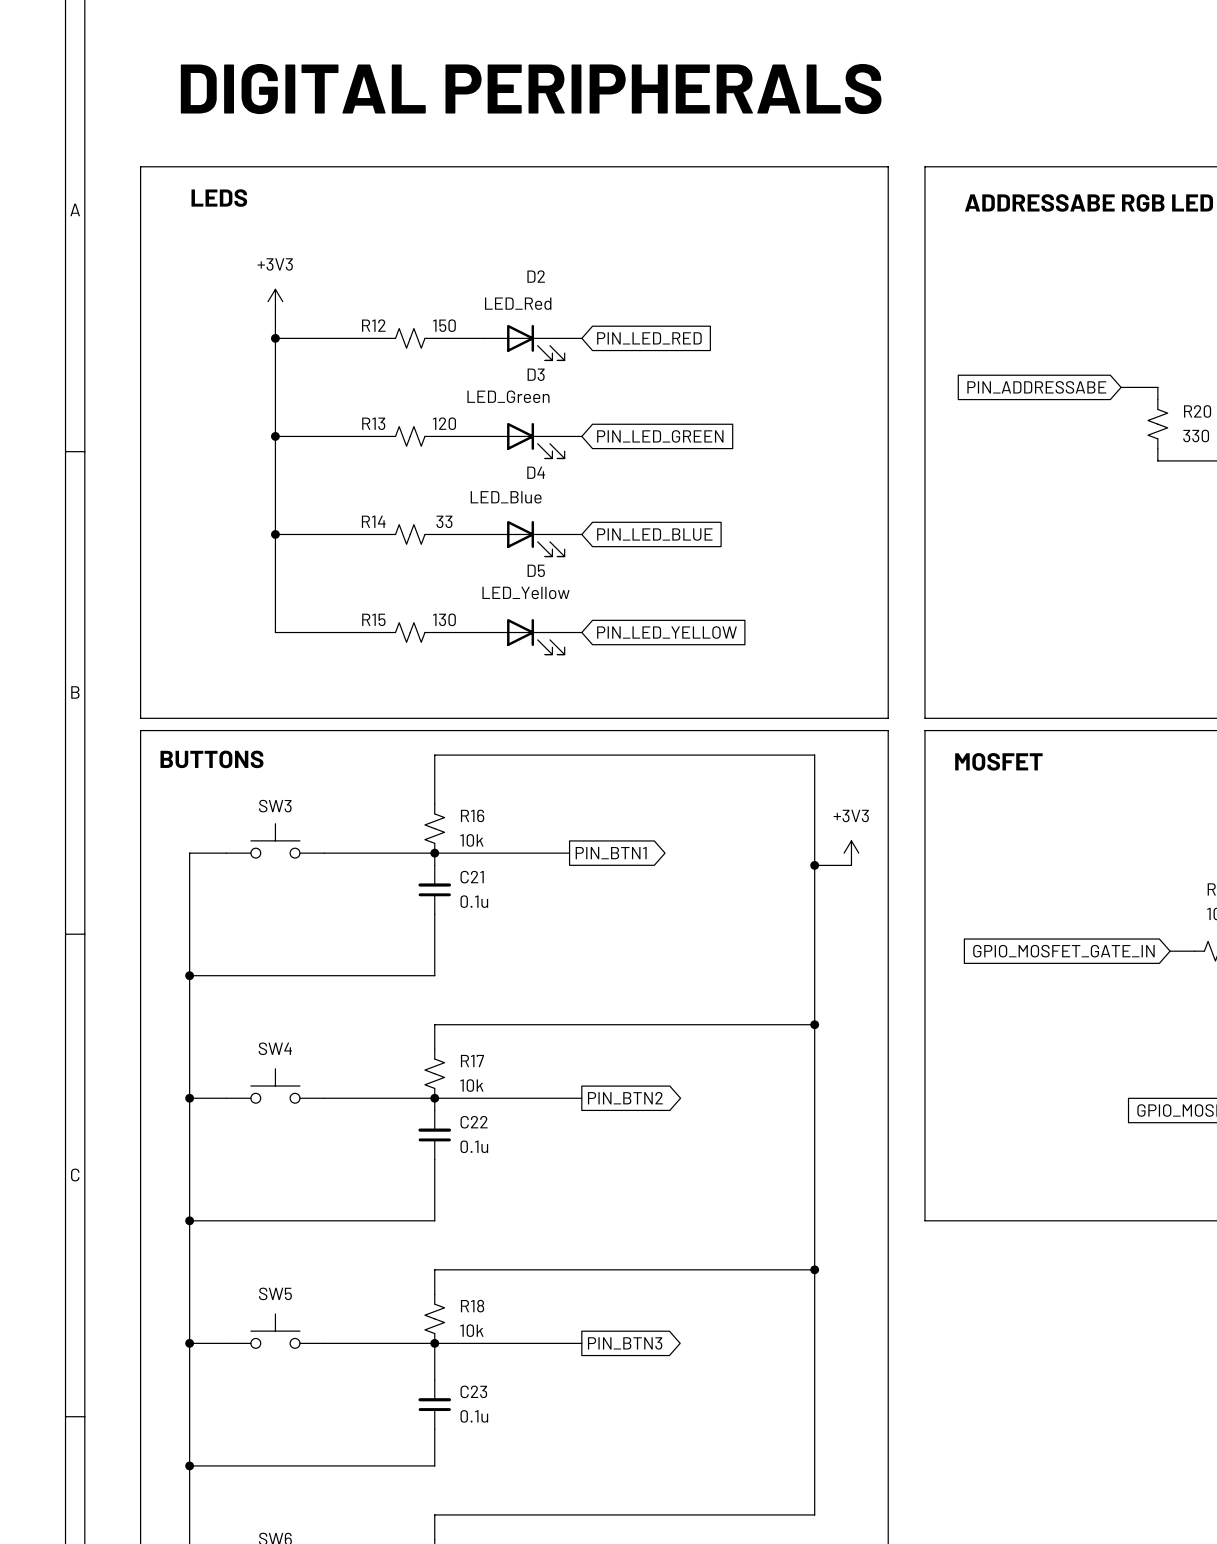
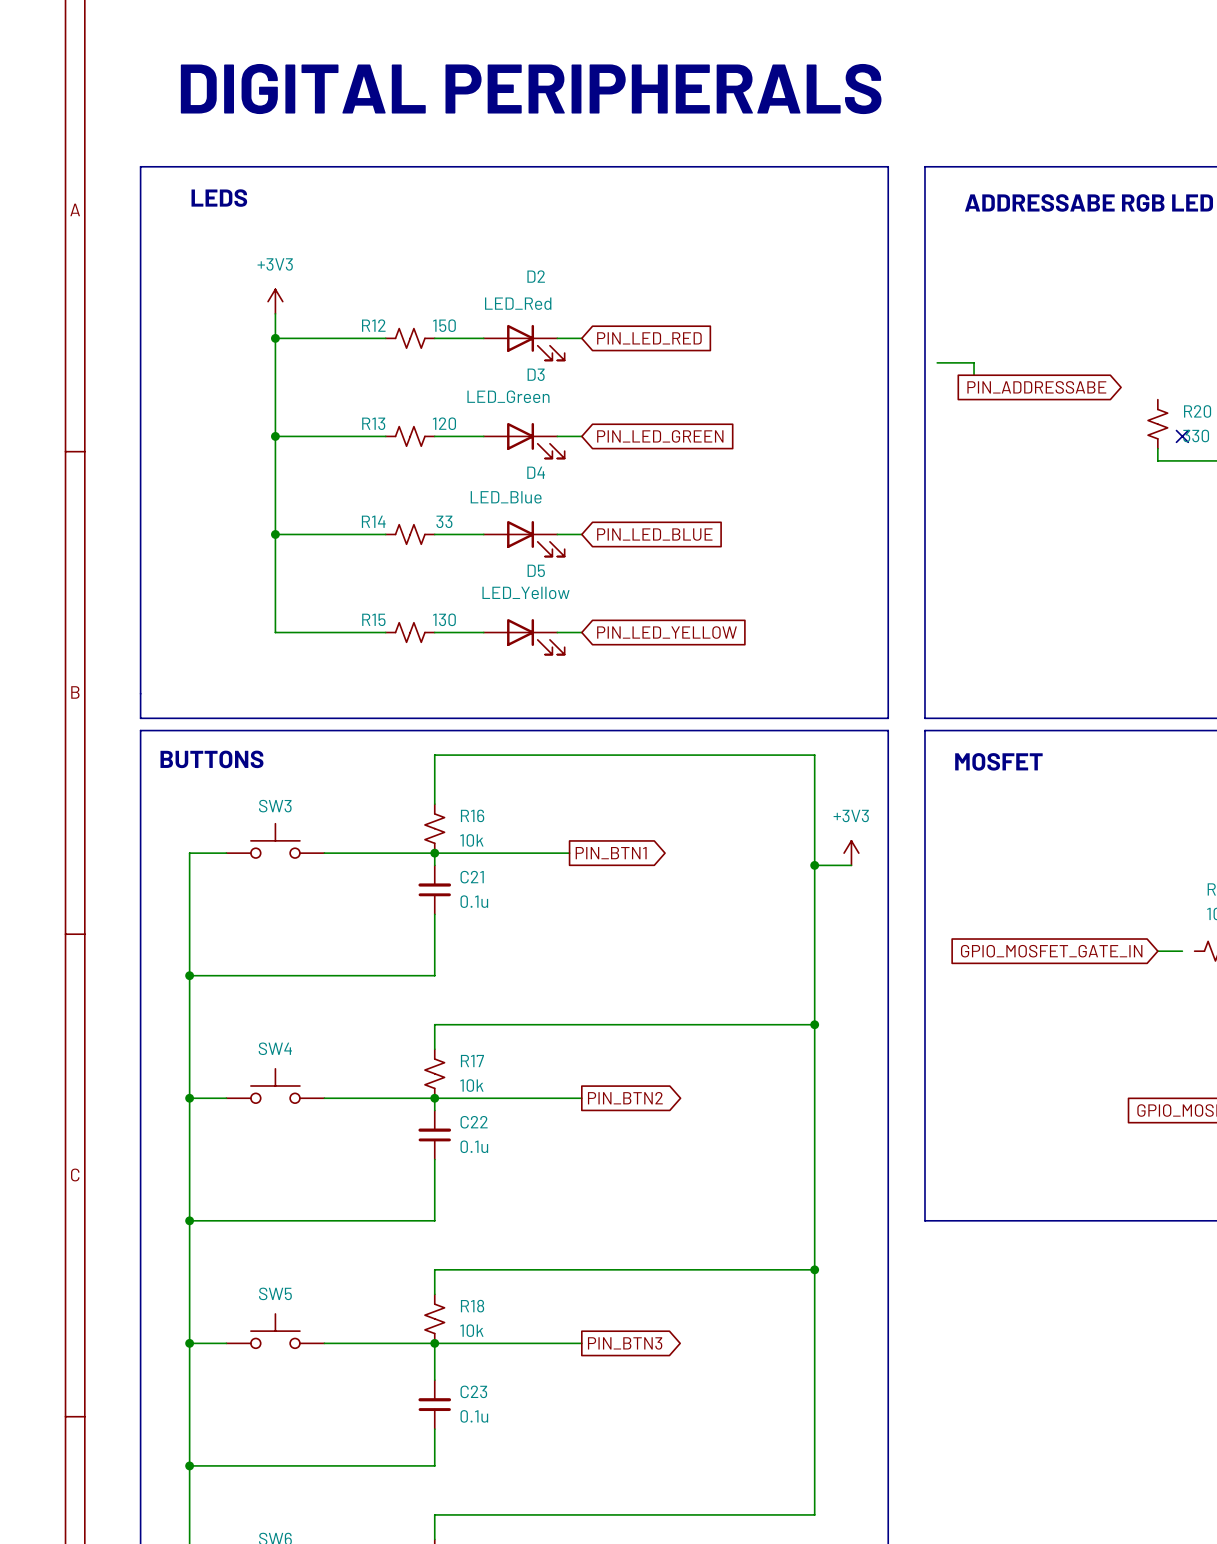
wire: (1121, 387) (1157, 387) (1157, 399) -> (937, 362) (974, 362) (974, 375)
no-connect mark: none -> (1182, 436)
global label position: GPIO_MOSFET_GATE_IN (1063, 951) -> GPIO_MOSFET_GATE_IN (1051, 951)
wire: (1182, 951) (1194, 951) -> (1157, 951) (1170, 951)

